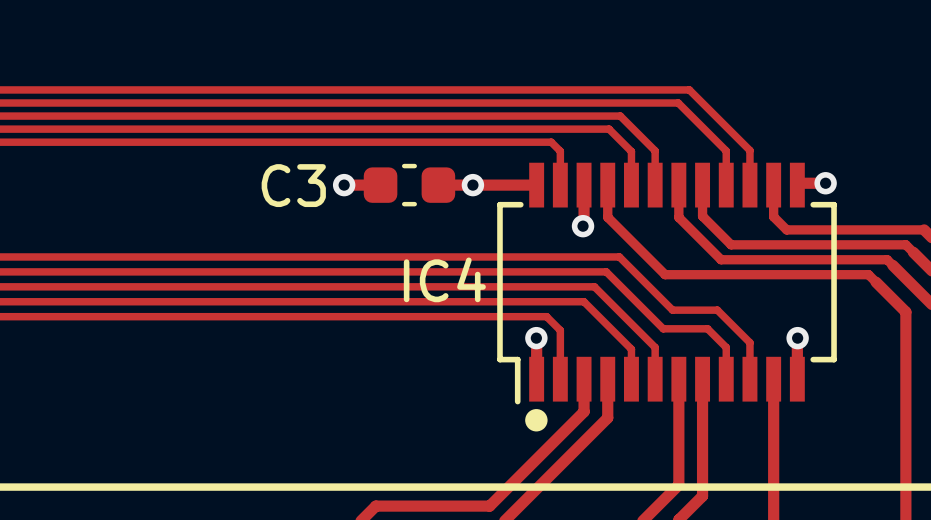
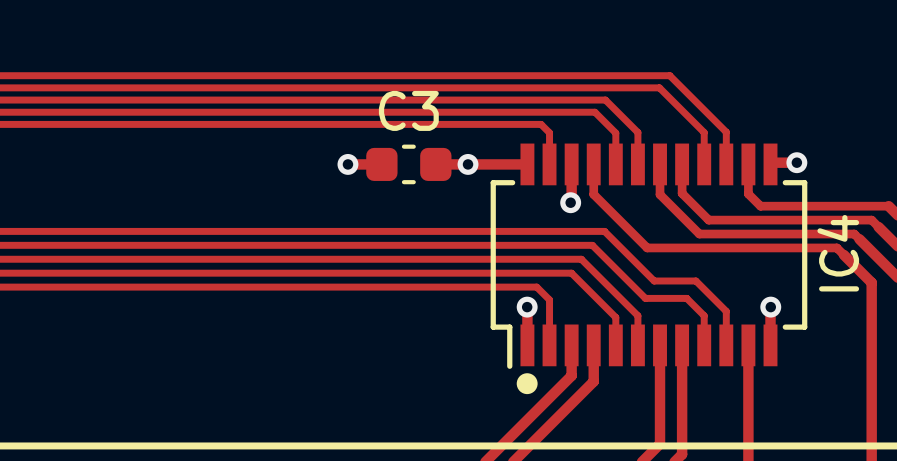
C3 name position: C3 (293, 185) -> C3 (408, 110)
IC4 name rotation: 0° (444, 279) -> 90° counterclockwise (838, 253)
IC4 name position: IC4 (444, 279) -> IC4 (838, 253)

